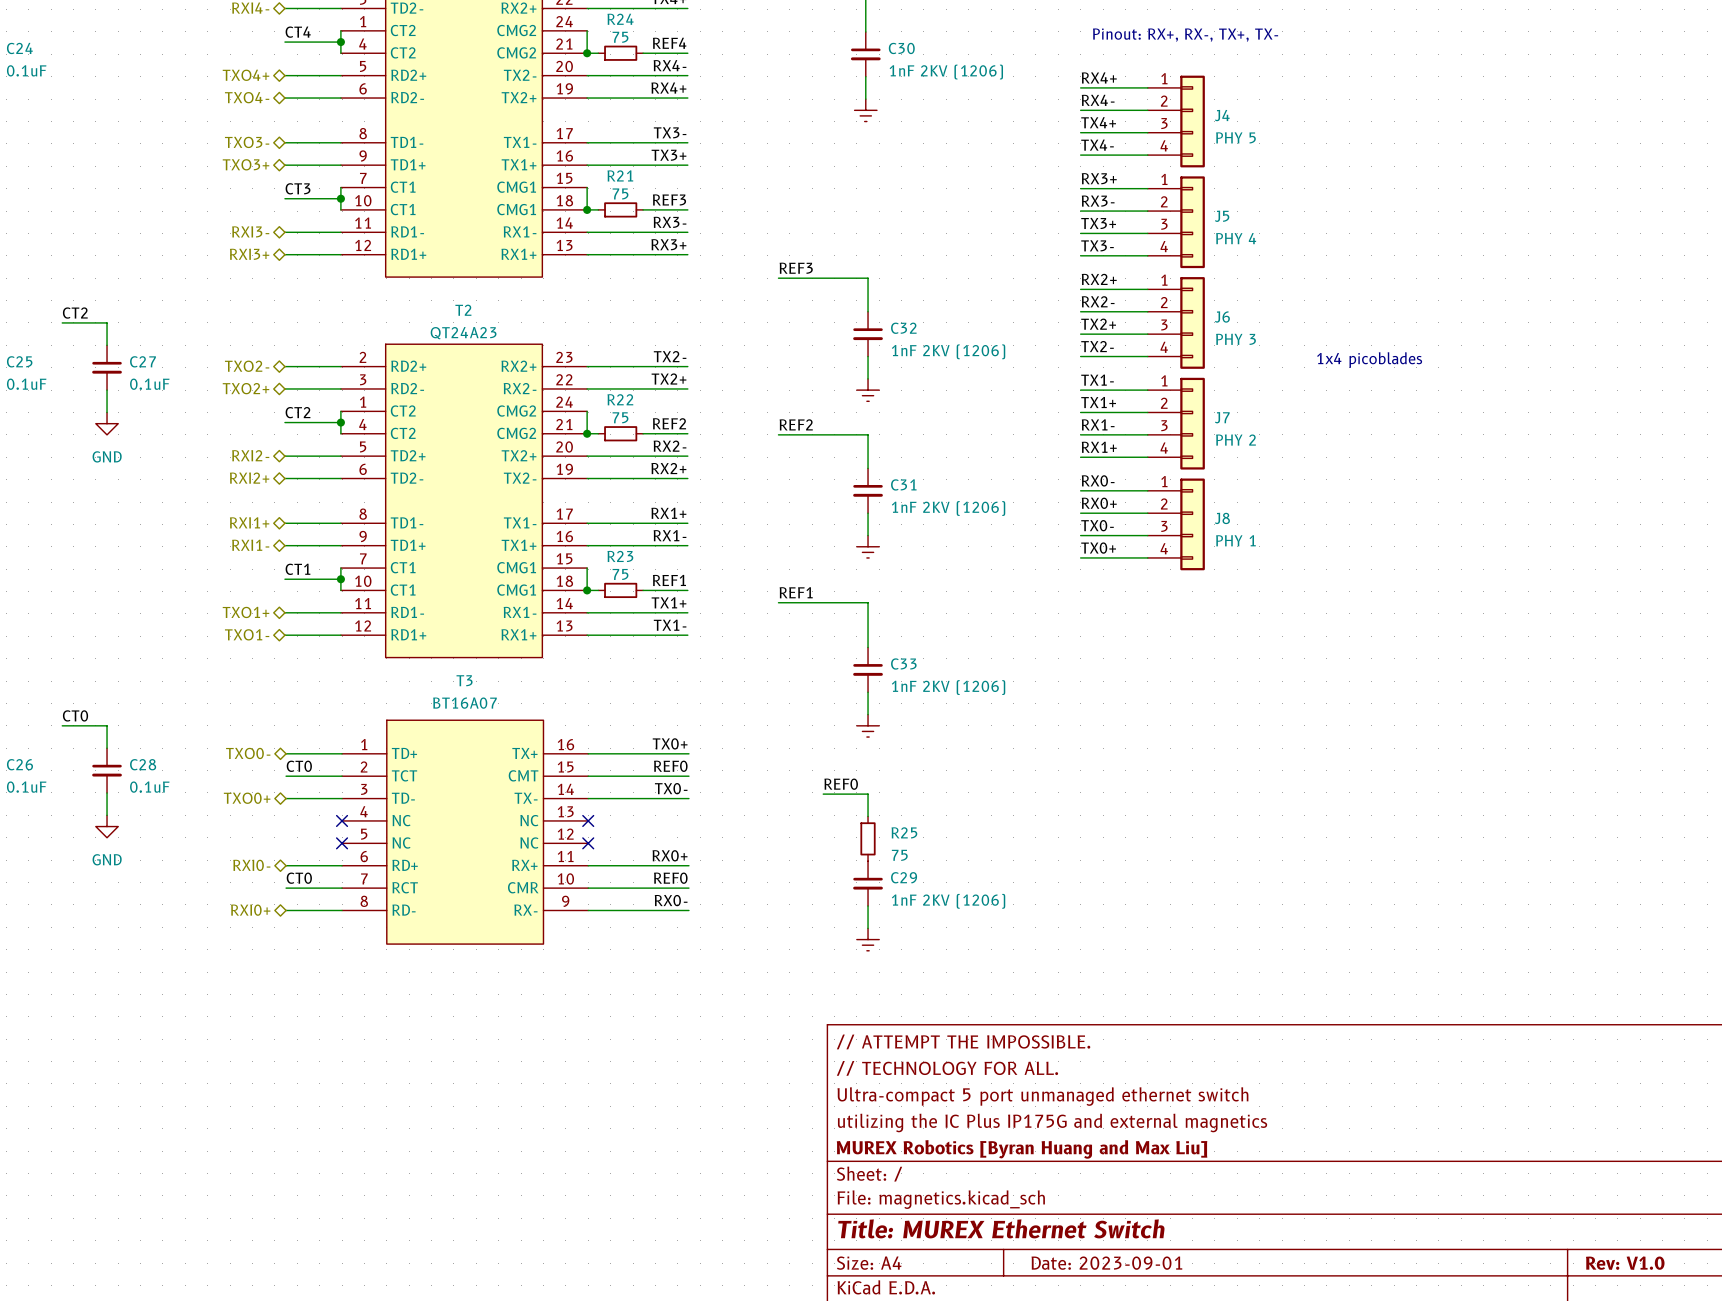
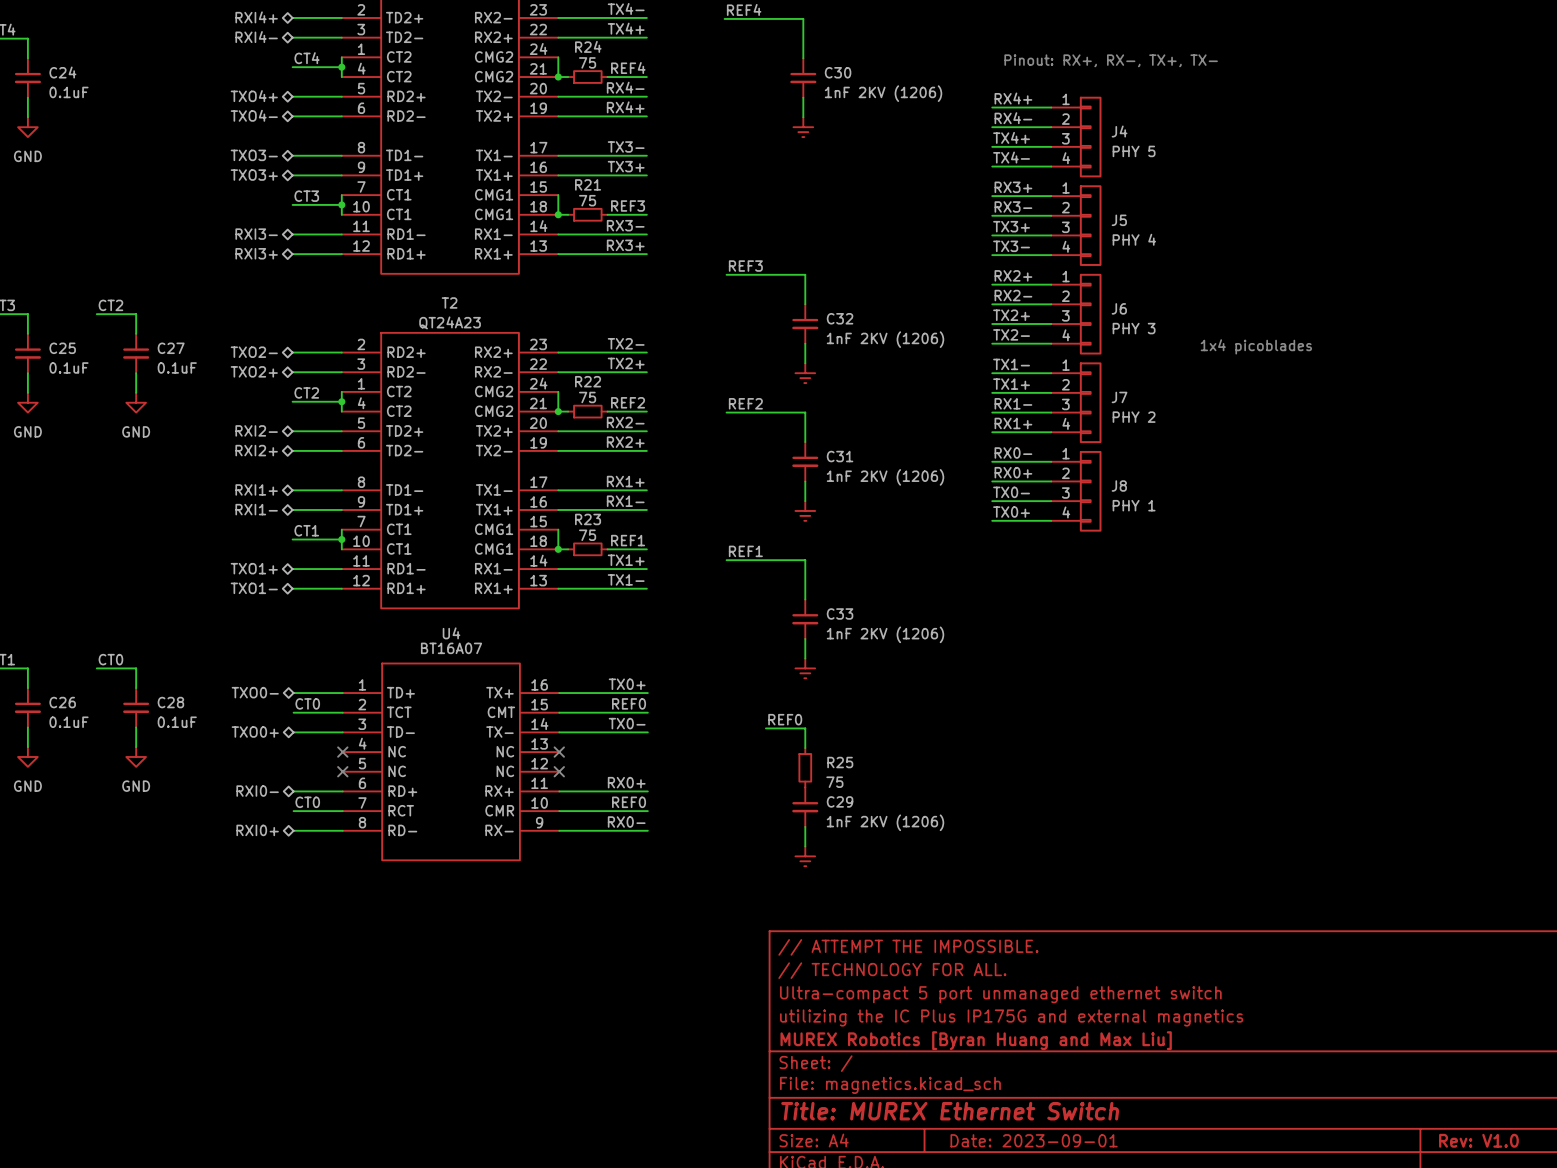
T3 name: T3 (464, 680) -> U4 (451, 633)

